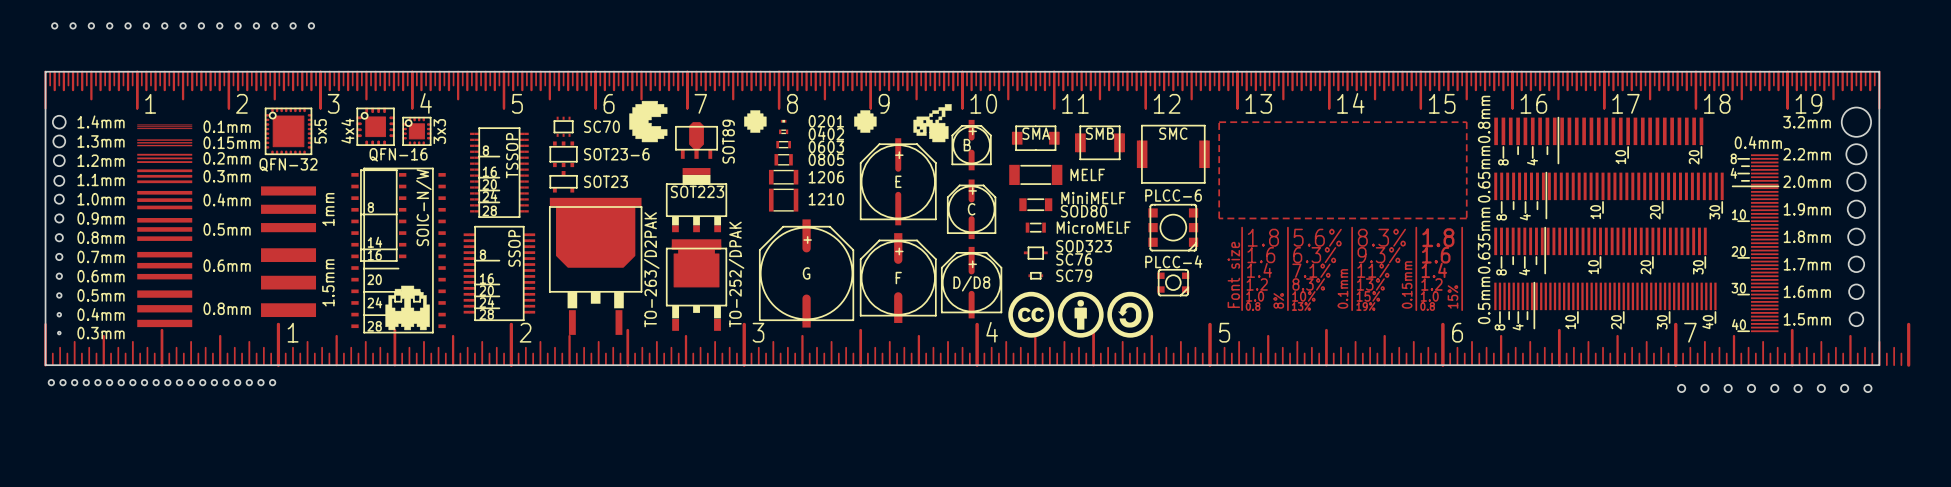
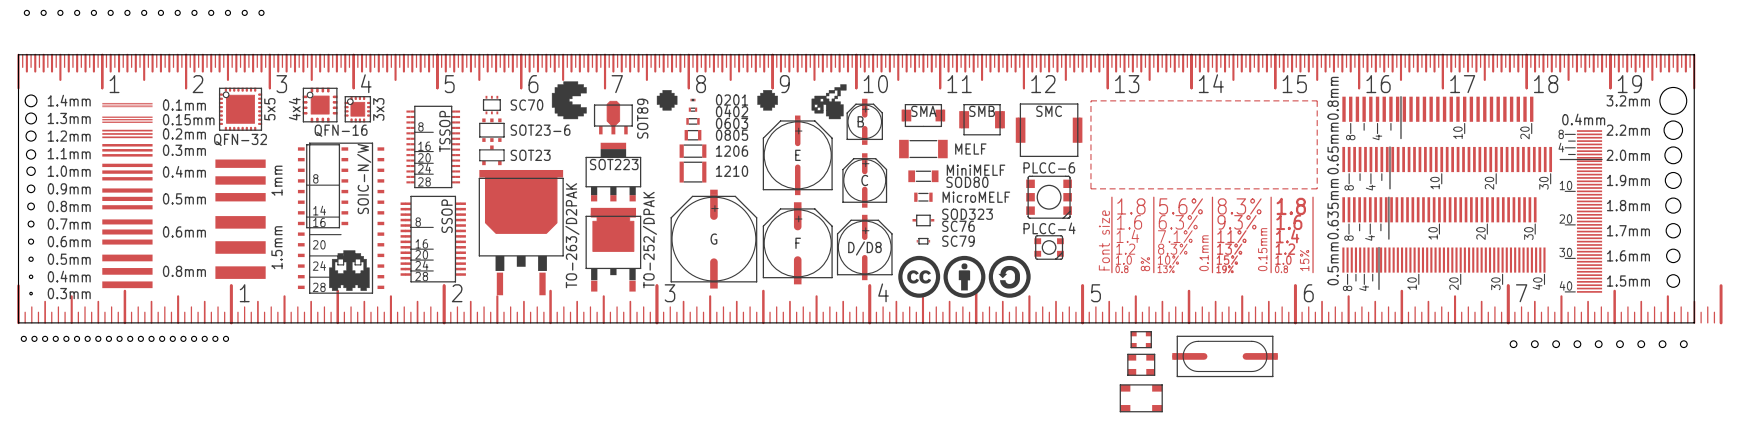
drawing: none -> [1119, 331, 1163, 413]
part: none -> (1225, 356)

